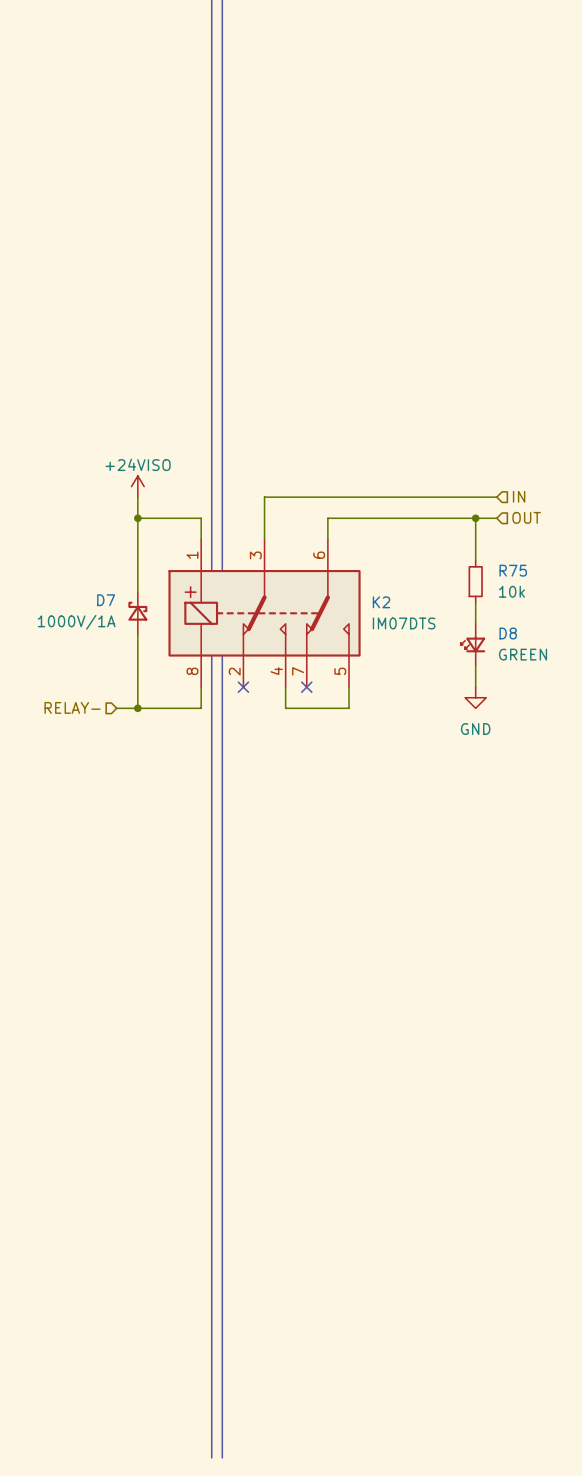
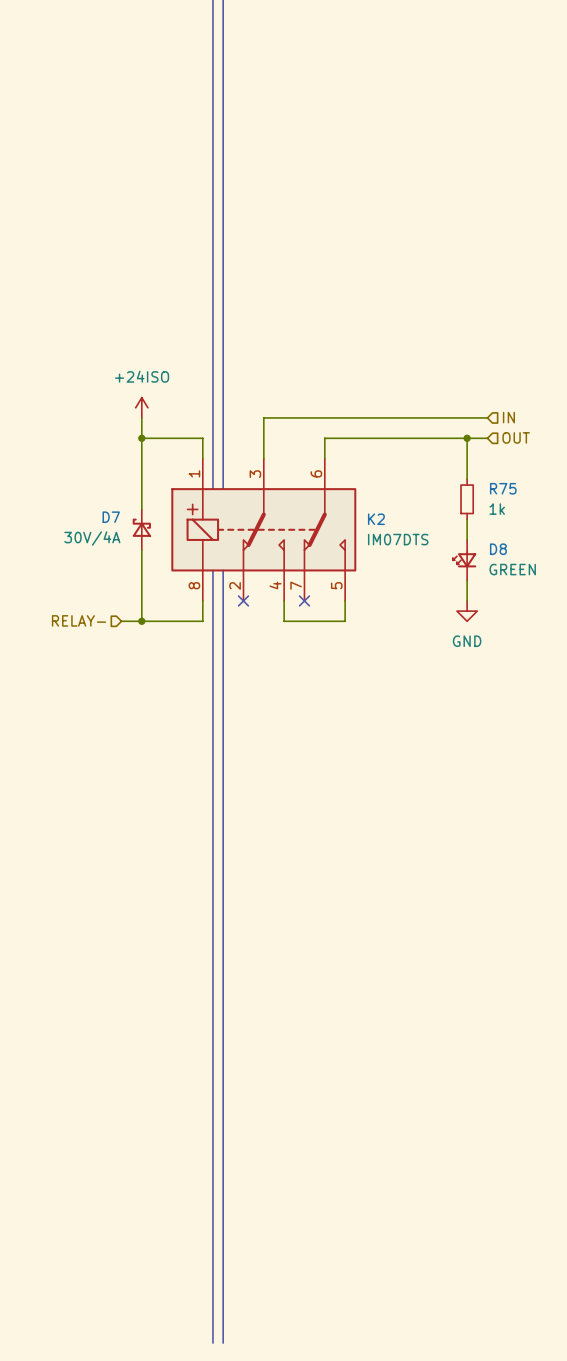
power symbol: +24VISO (137, 486) -> +24ISO (141, 407)
R75 value: 10k (511, 591) -> 1k (497, 509)
D7 value: 1000V/1A (76, 622) -> 30V/4A (92, 538)

